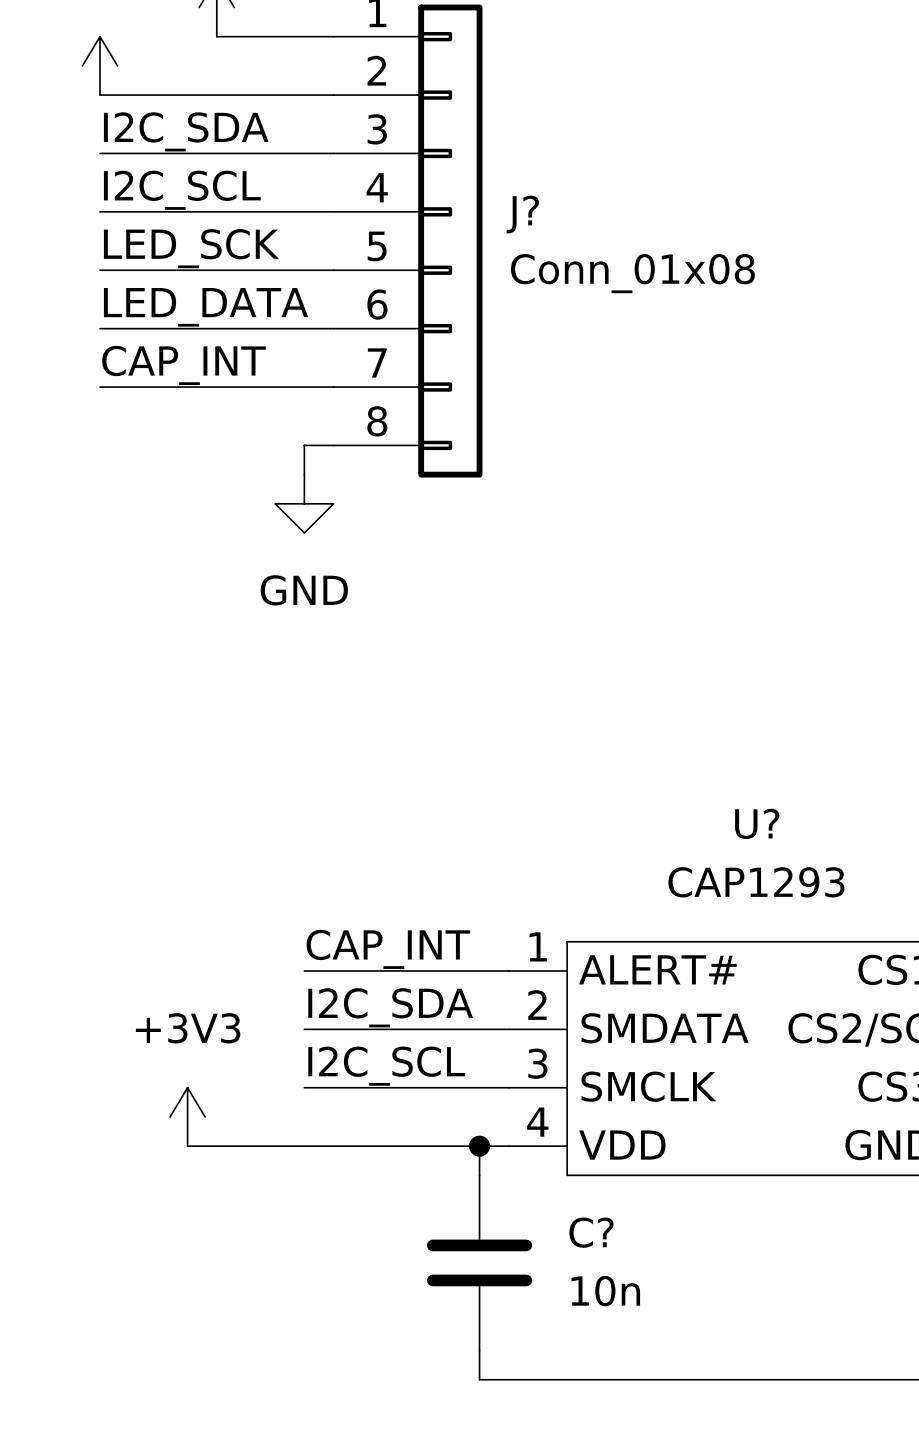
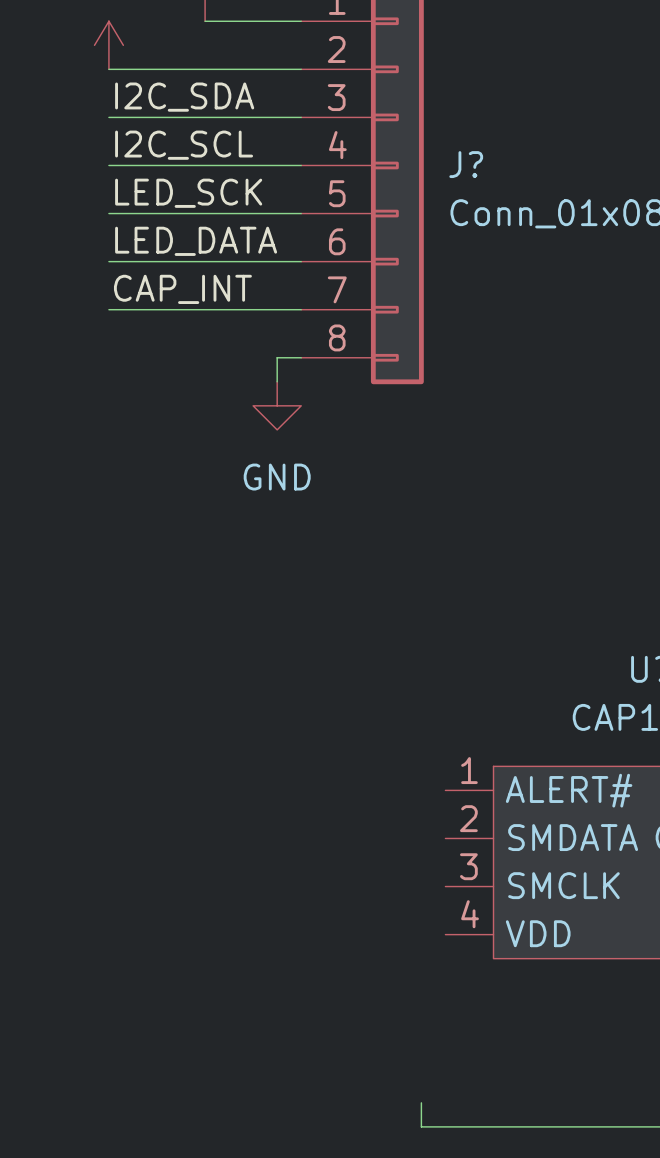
label: CAP_INT (388, 949) -> none
wire: (304, 970) (508, 970) -> none
label: I2C_SDA (390, 1007) -> none
wire: (304, 1029) (508, 1029) -> none
label: I2C_SCL (386, 1066) -> none
wire: (304, 1087) (508, 1087) -> none
power symbol: +3V3 (187, 1116) -> none
wire: (187, 1146) (508, 1146) -> none
wire: (479, 1146) (479, 1175) -> none
junction: (479, 1146) -> none
C?: 10n (479, 1262) -> none

